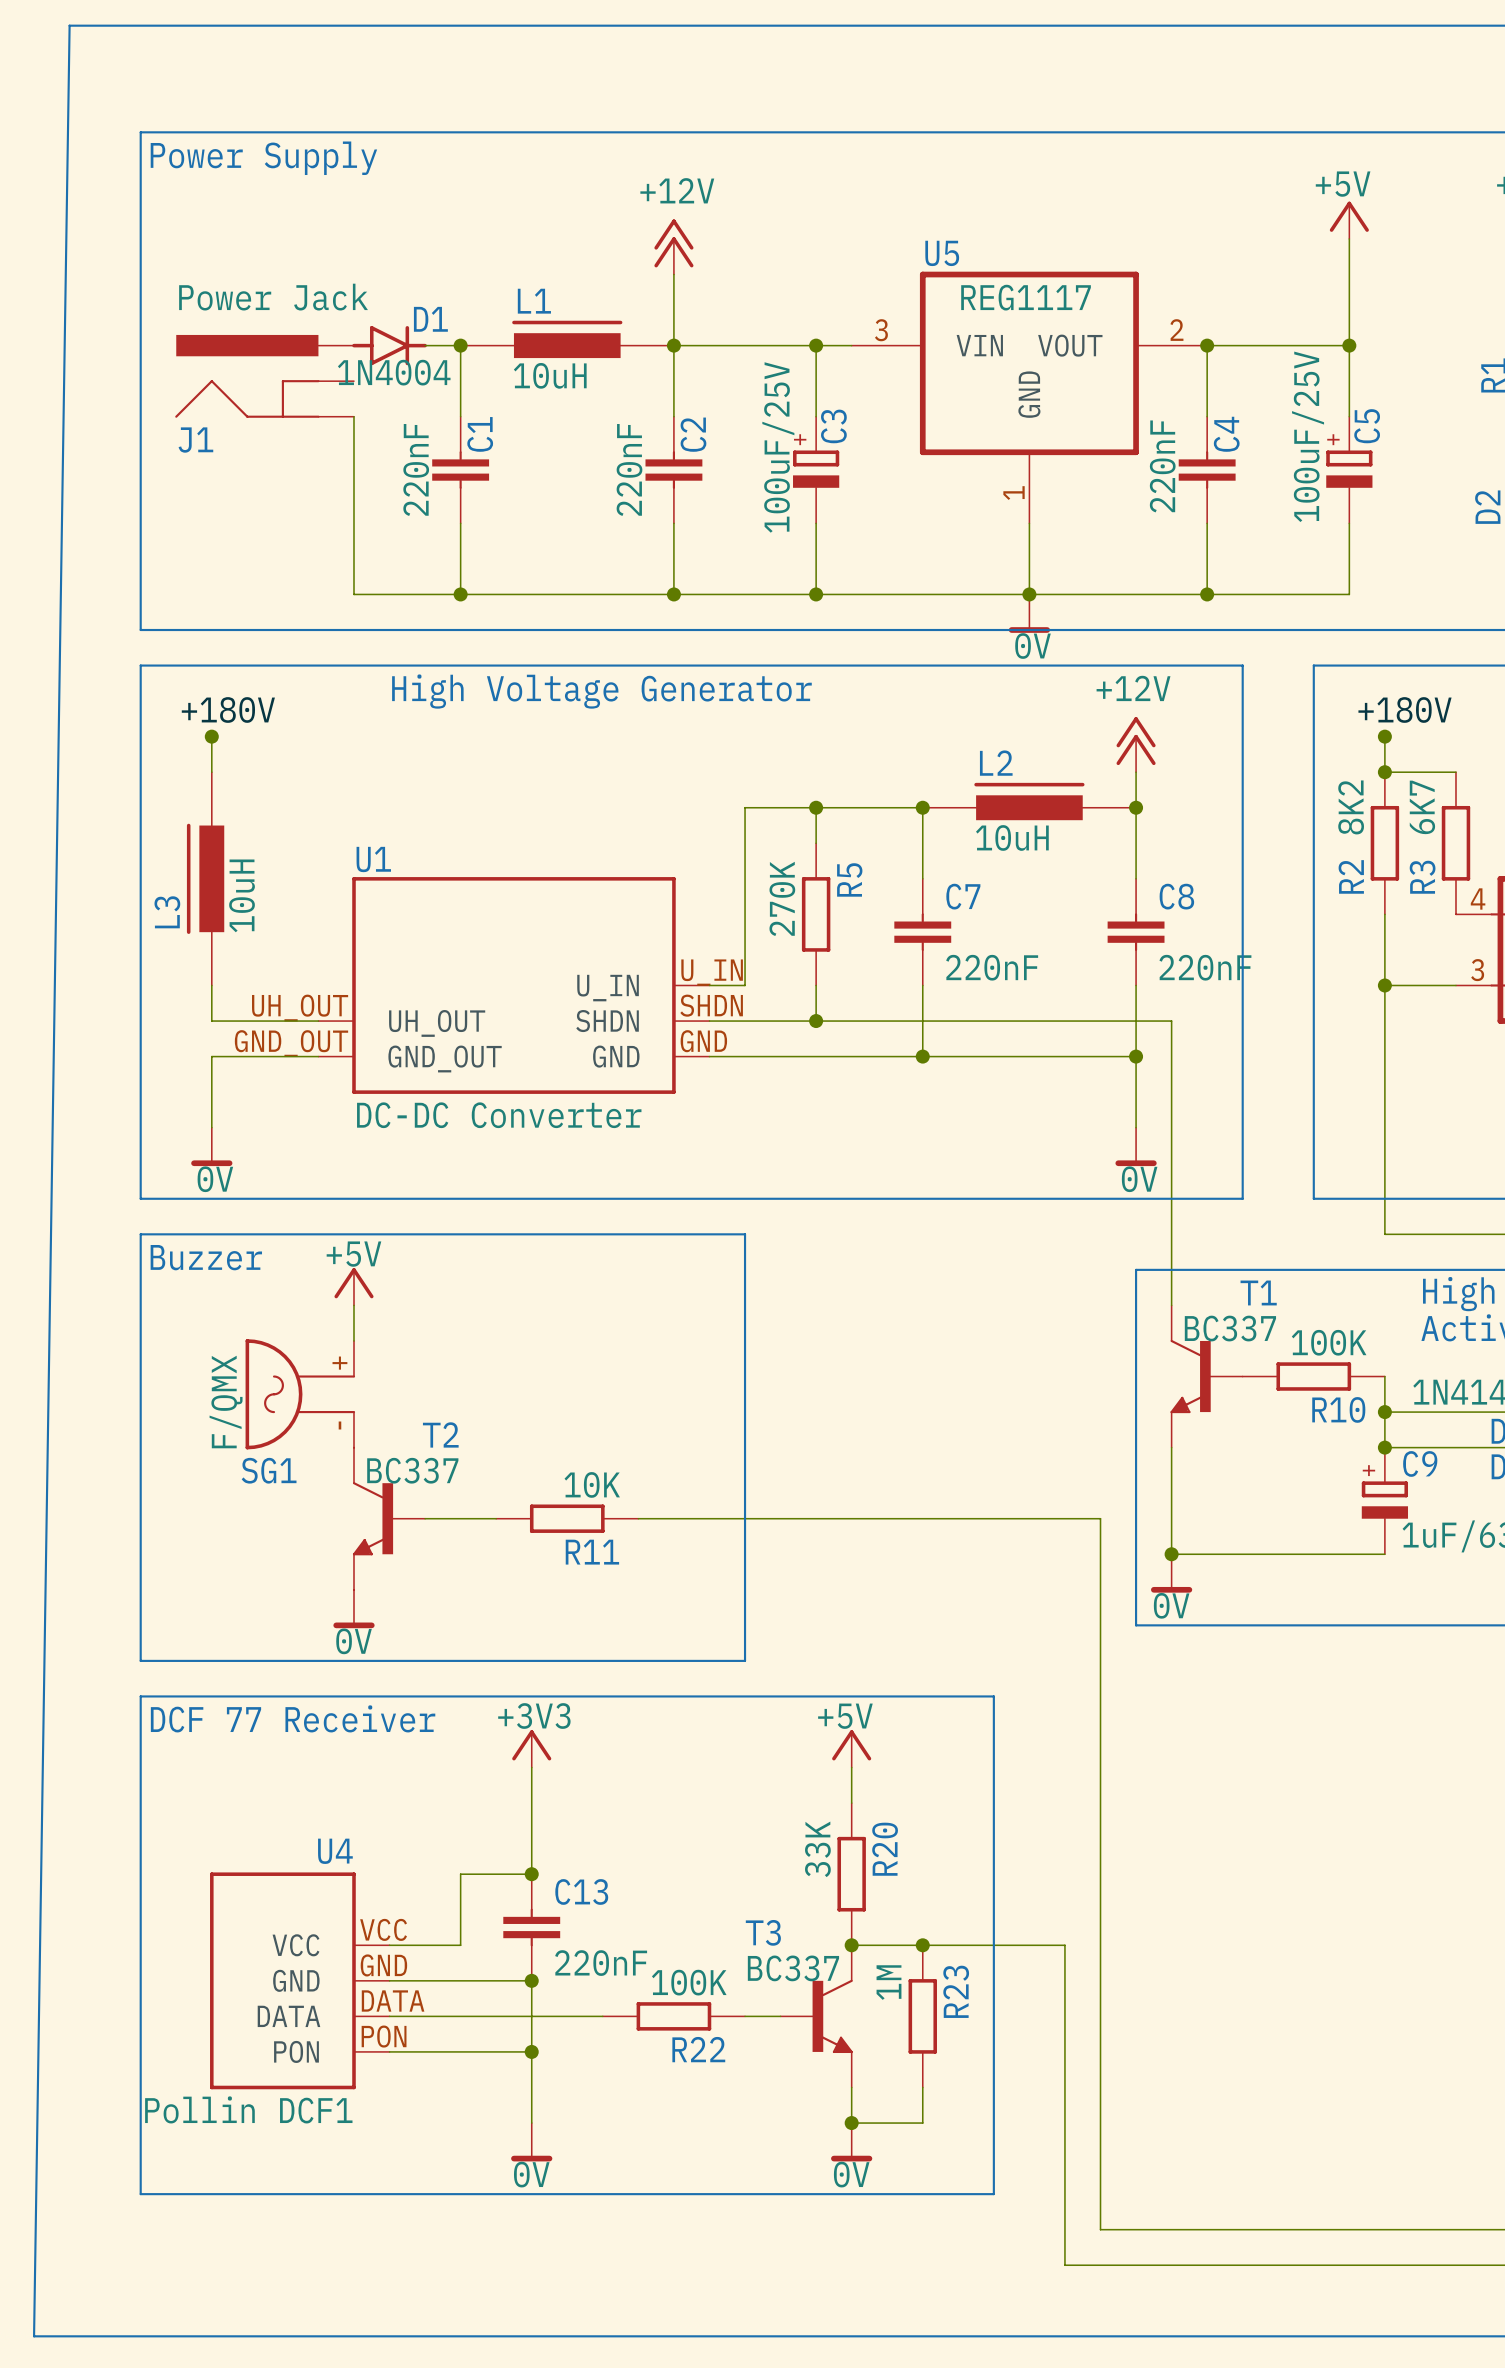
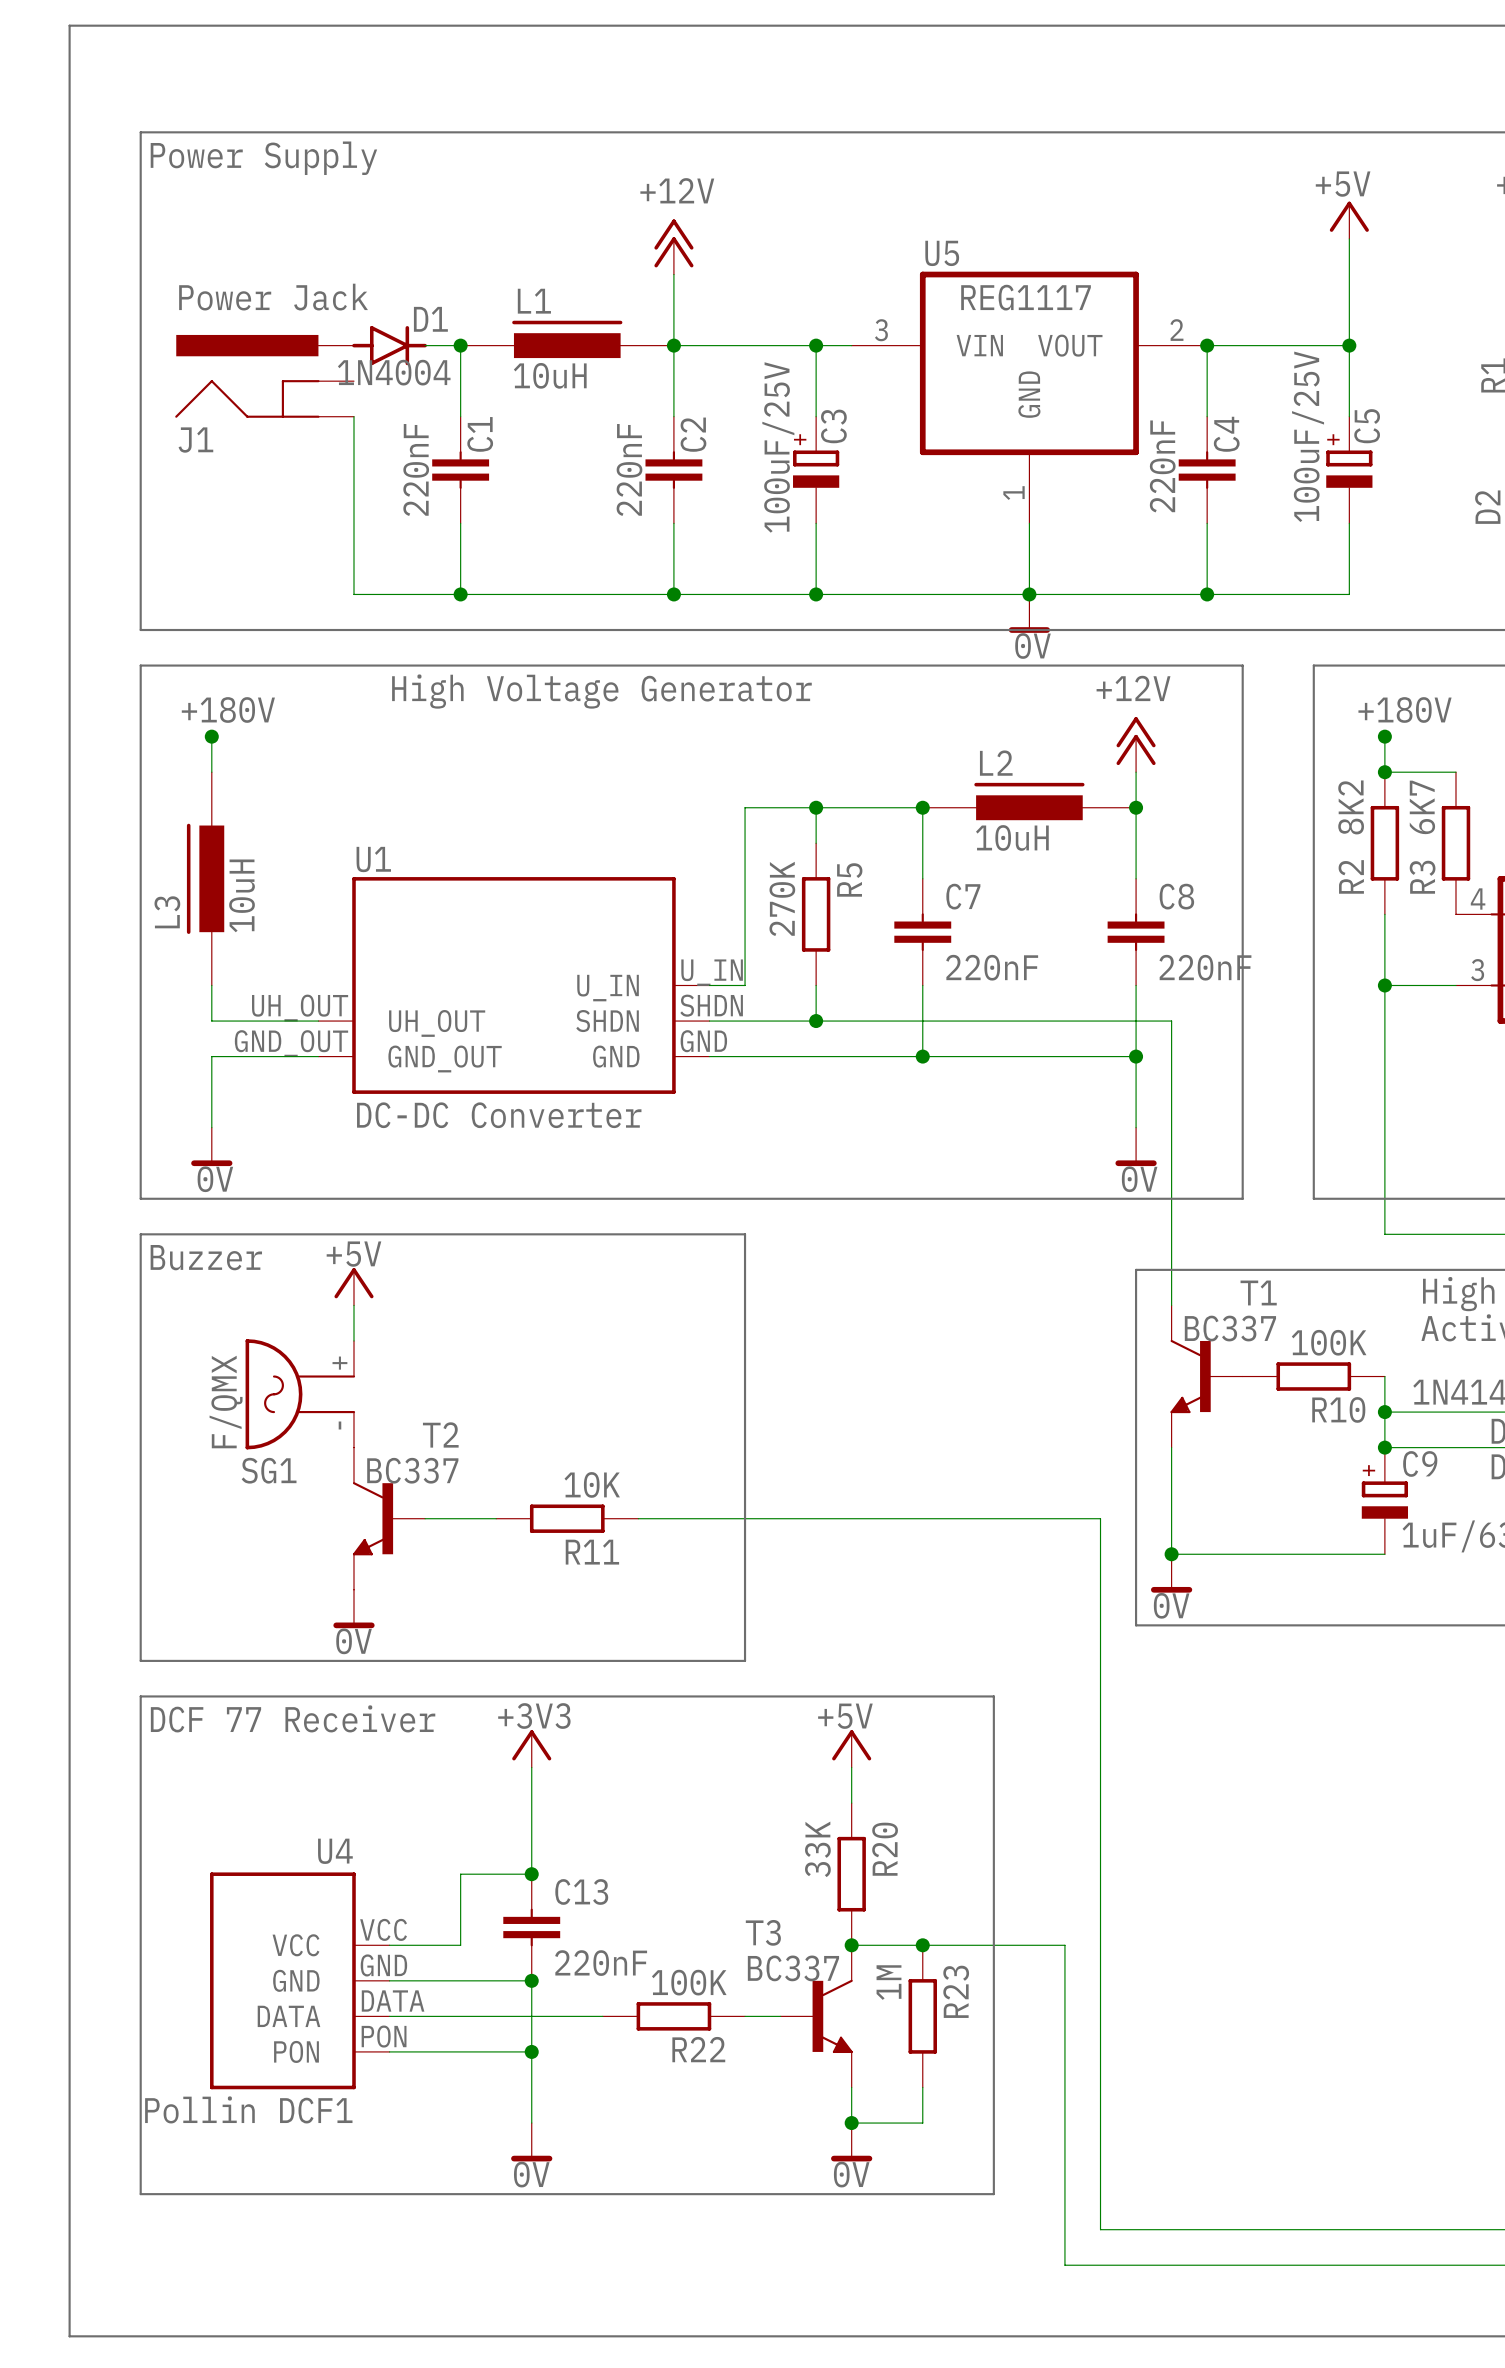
line: (69, 25) (34, 2336) (69, 2336) -> (69, 25) (69, 2336)

